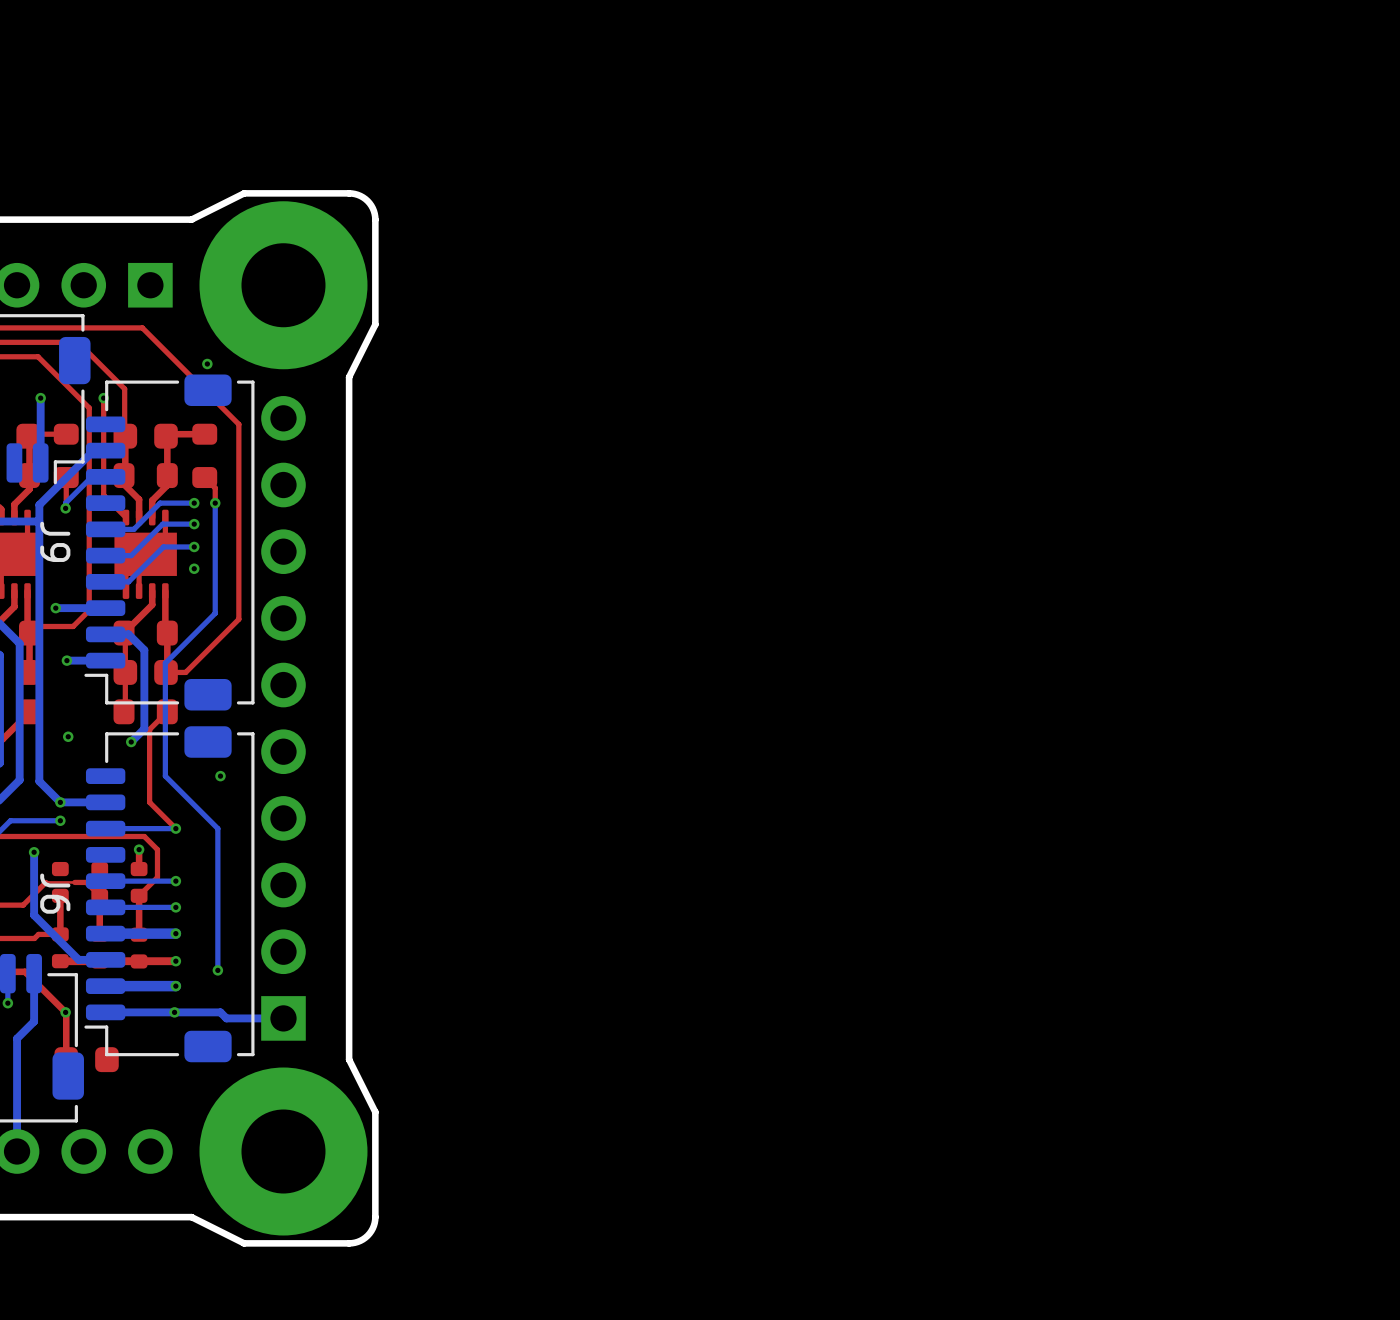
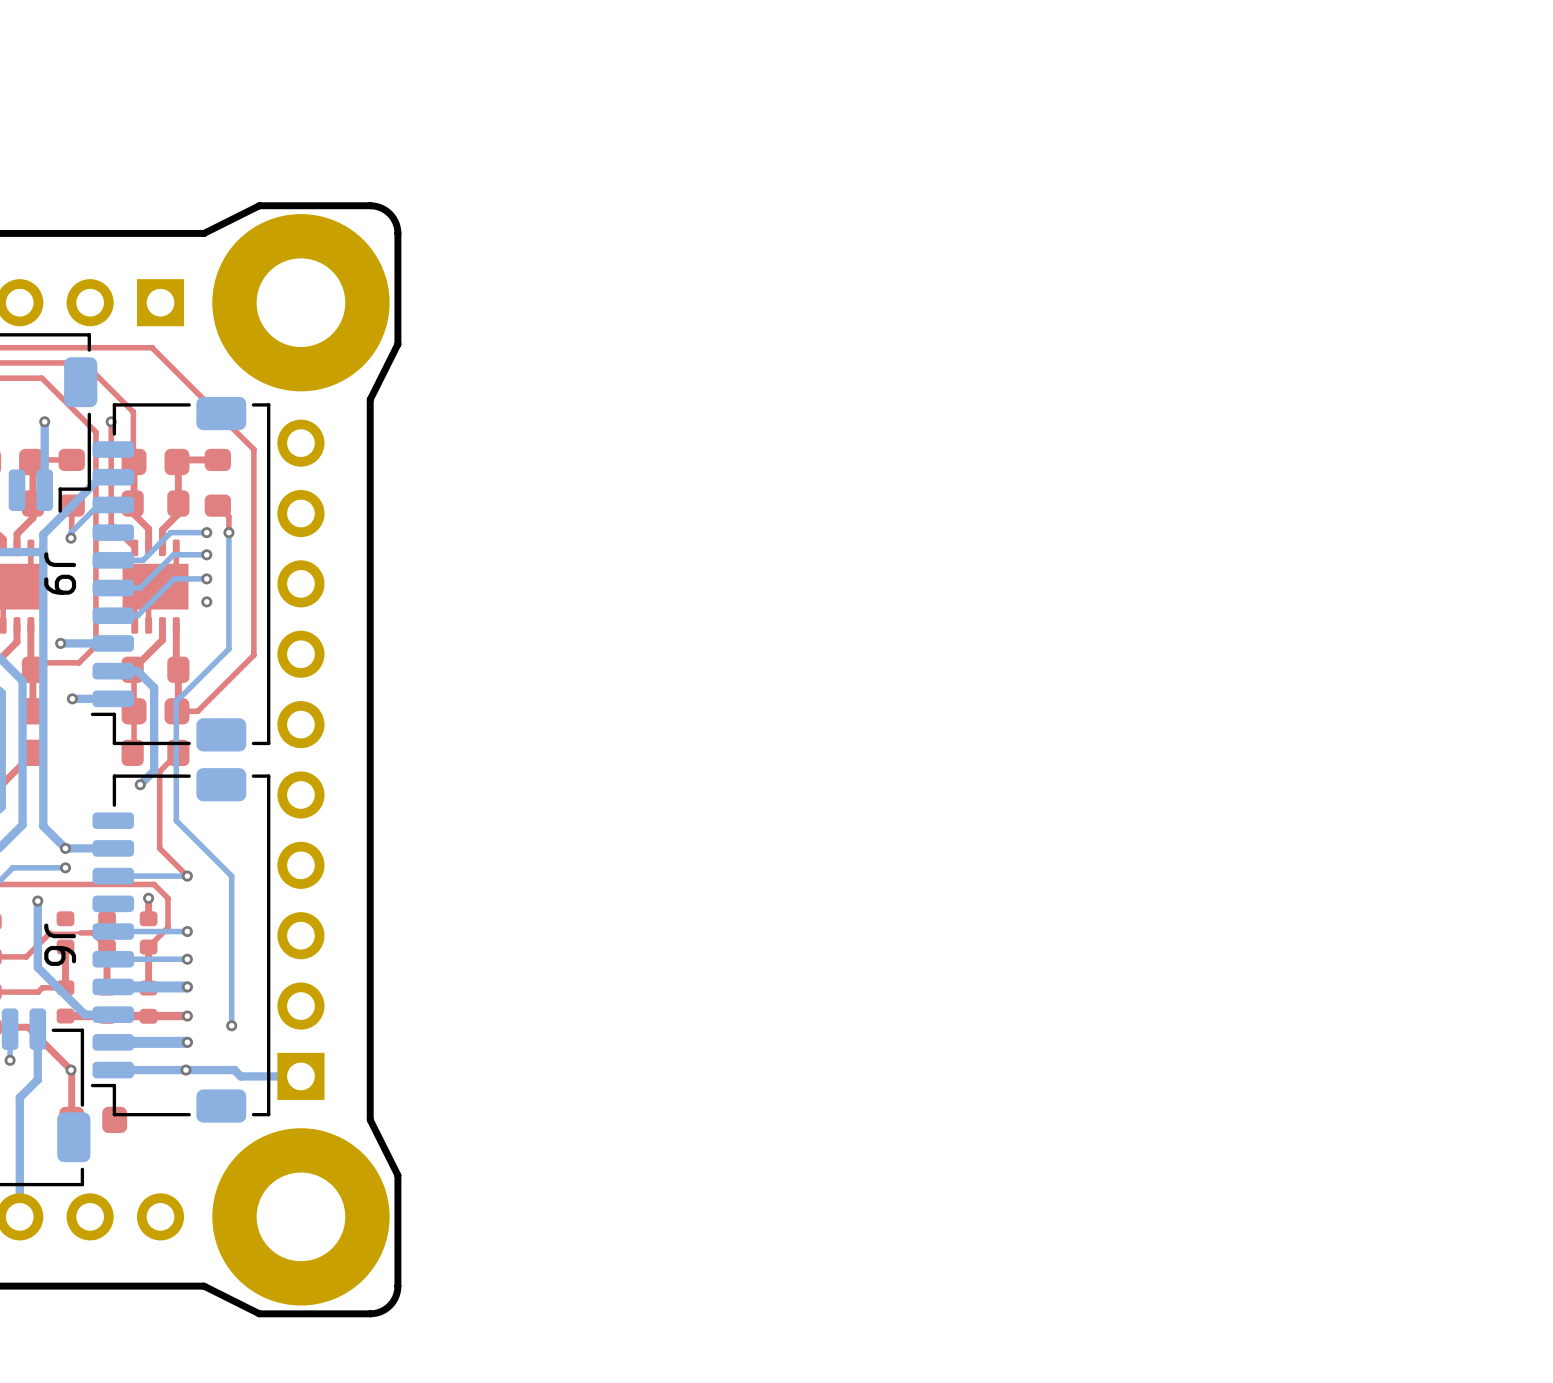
via: (207, 364) -> none
via: (68, 736) -> none
via: (220, 776) -> none

